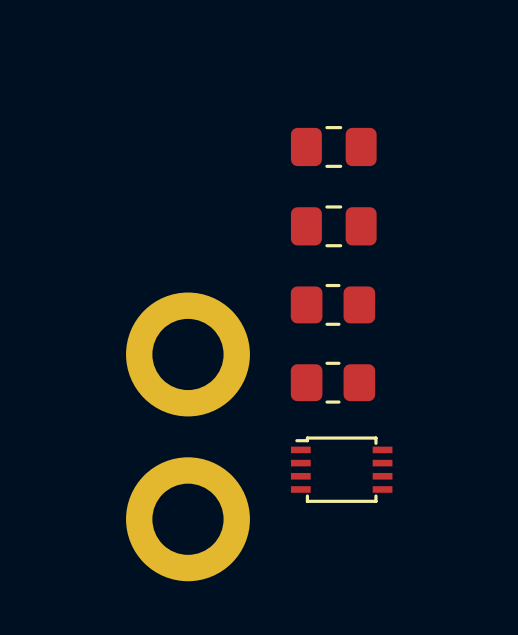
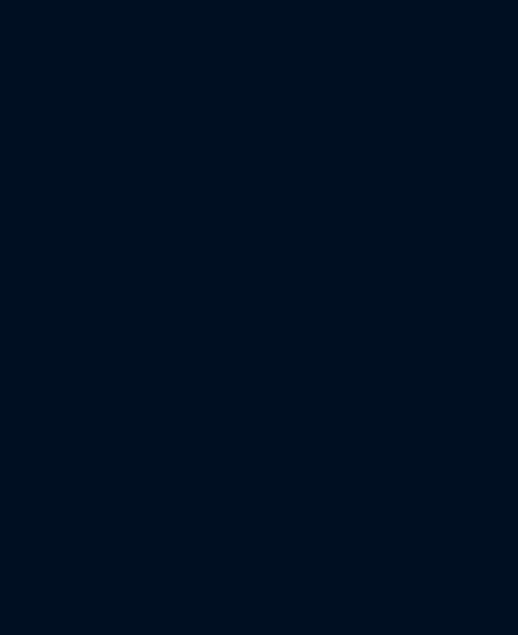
part: (333, 146) -> none
part: (333, 226) -> none
part: (332, 304) -> none
part: (187, 354) -> none
part: (332, 382) -> none
part: (341, 469) -> none
part: (187, 519) -> none

